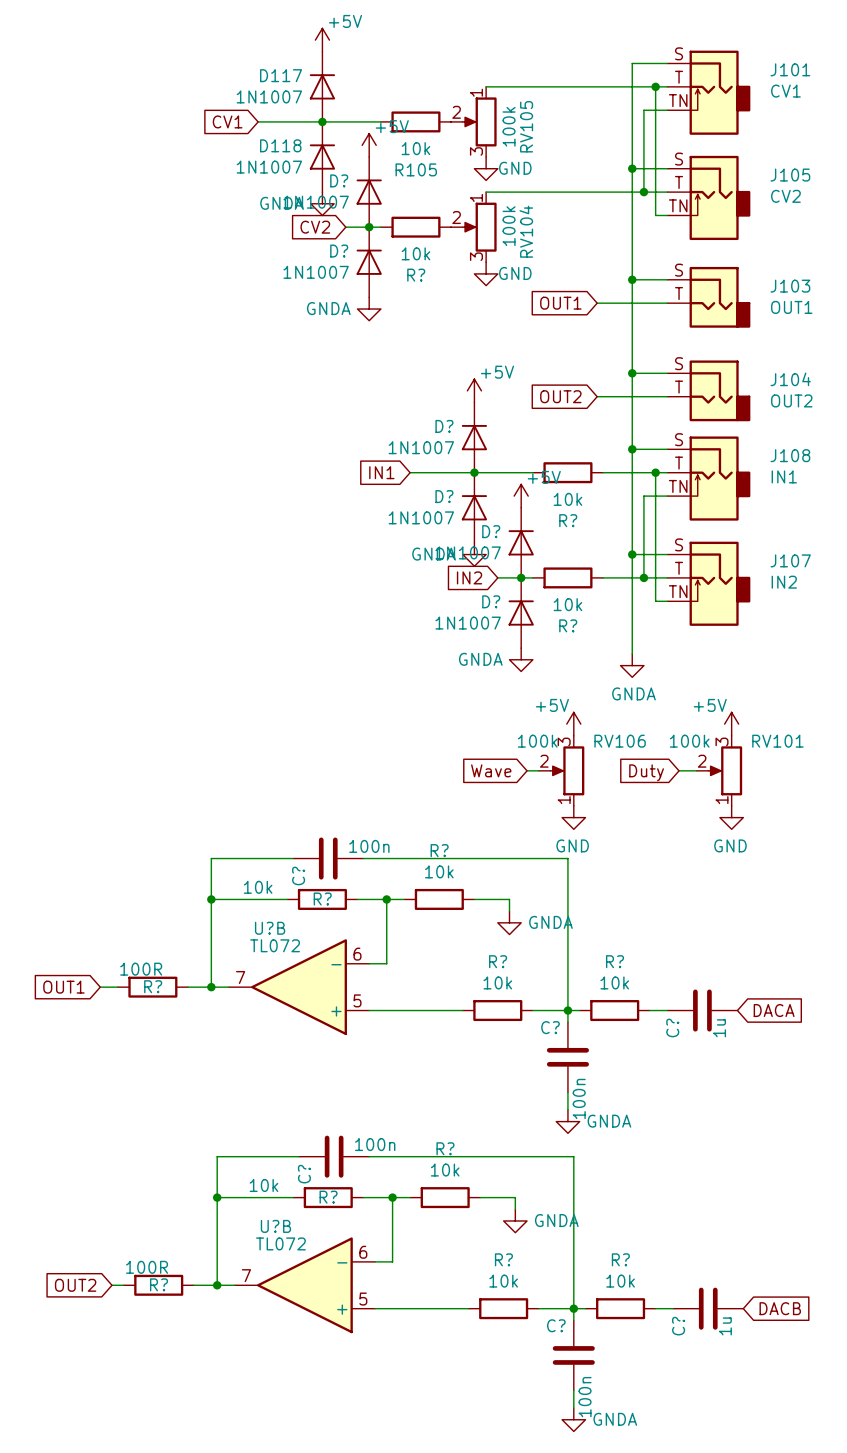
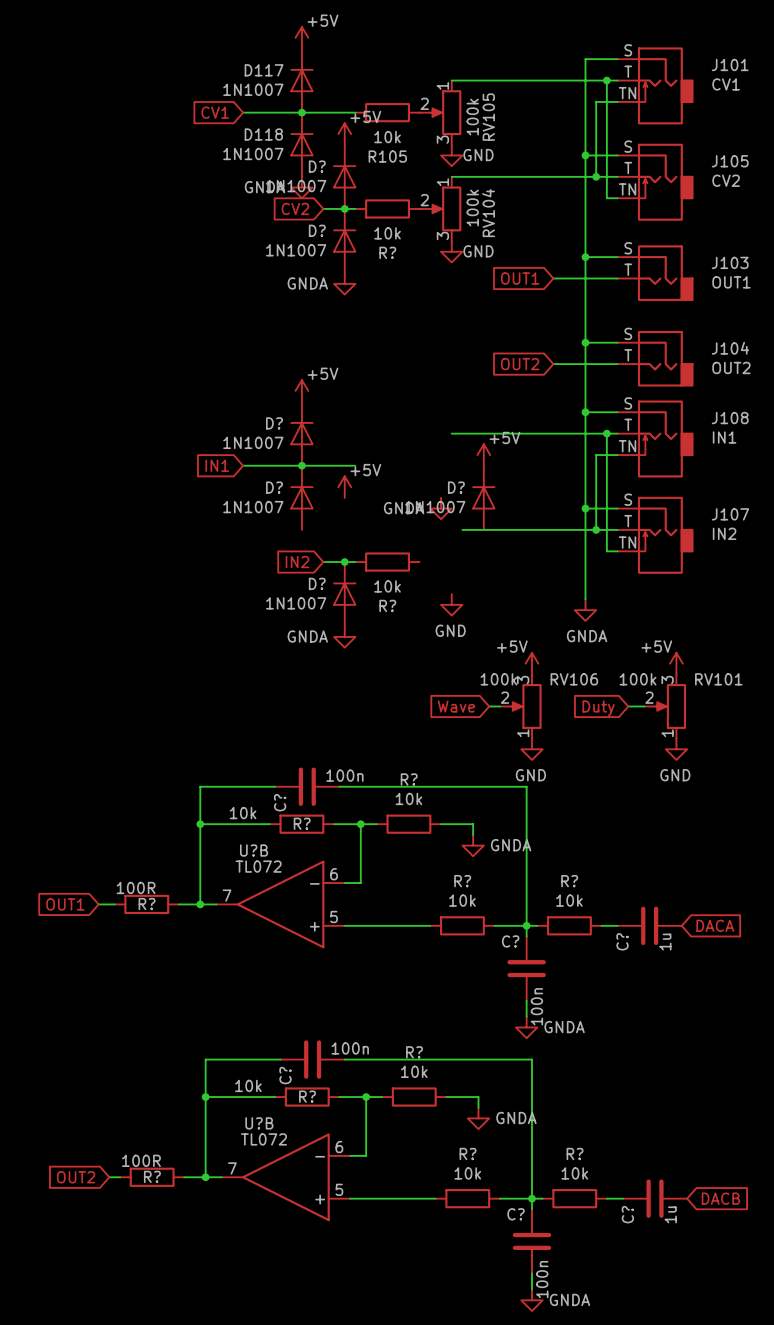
power symbol: +5V (474, 390) -> none
power symbol: none -> +5V (301, 390)
D?: 1N1007 (474, 437) -> none
D?: none -> 1N1007 (301, 433)
global label position: IN1 (381, 472) -> IN1 (217, 465)
wire: (410, 472) (486, 472) -> none
junction: (474, 472) -> none
wire: none -> (494, 433) (558, 433)
R?: 10k (567, 472) -> none
wire: none -> (243, 465) (355, 465)
junction: none -> (301, 465)
D?: 1N1007 (474, 507) -> none
power symbol: none -> +5V (344, 487)
D?: none -> 1N1007 (301, 497)
global label position: IN2 (469, 577) -> IN2 (297, 562)
junction: (521, 577) -> none
wire: none -> (494, 529) (558, 529)
R?: 10k (567, 577) -> none
wire: none -> (323, 562) (355, 562)
junction: none -> (344, 562)
R?: none -> 10k (387, 562)
D?: 1N1007 (521, 613) -> none
D?: none -> 1N1007 (344, 594)
power symbol: none -> GND (451, 604)
power symbol position: GNDA (521, 659) -> GNDA (344, 636)

